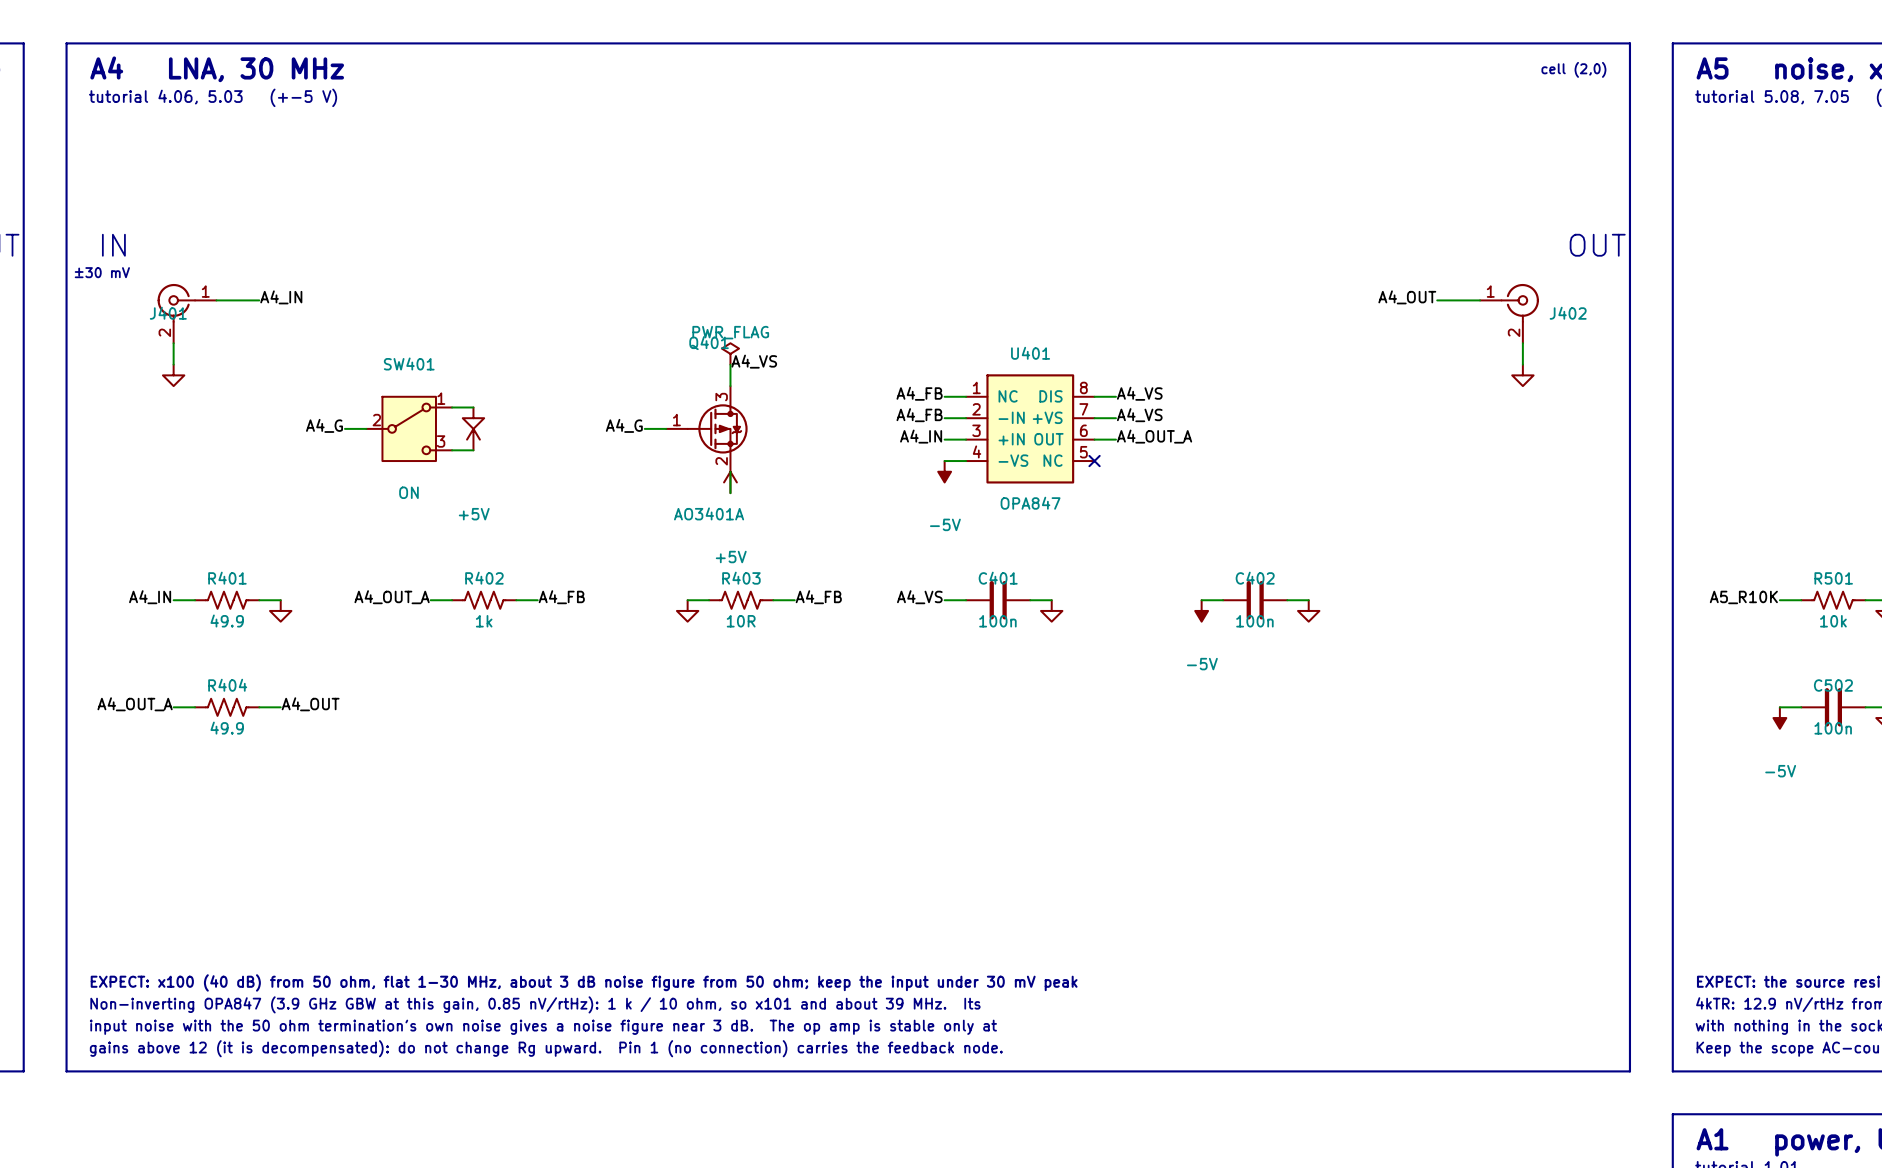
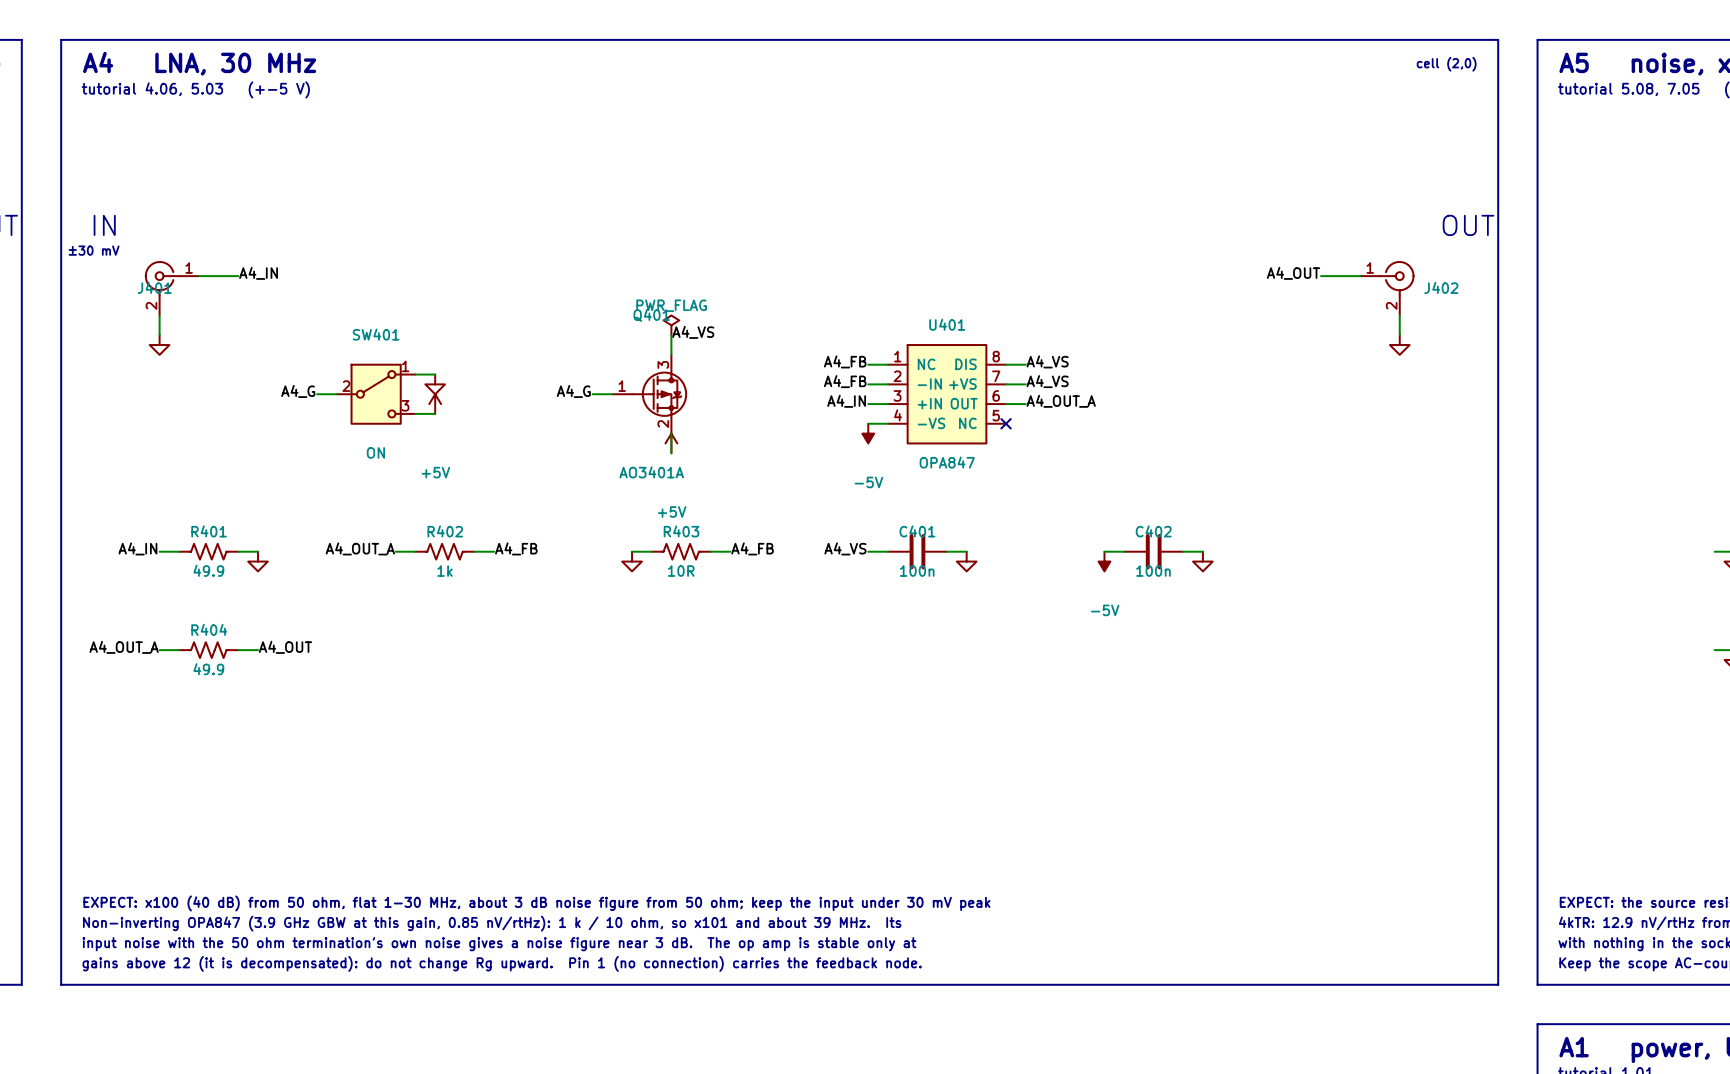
label: A5_R10K (1743, 597) -> none
wire: (1779, 600) (1801, 600) -> none
R501: 10k (1833, 600) -> none
wire: (1779, 707) (1801, 707) -> none
C502: 100n (1833, 707) -> none
power symbol: -5V (1779, 718) -> none

